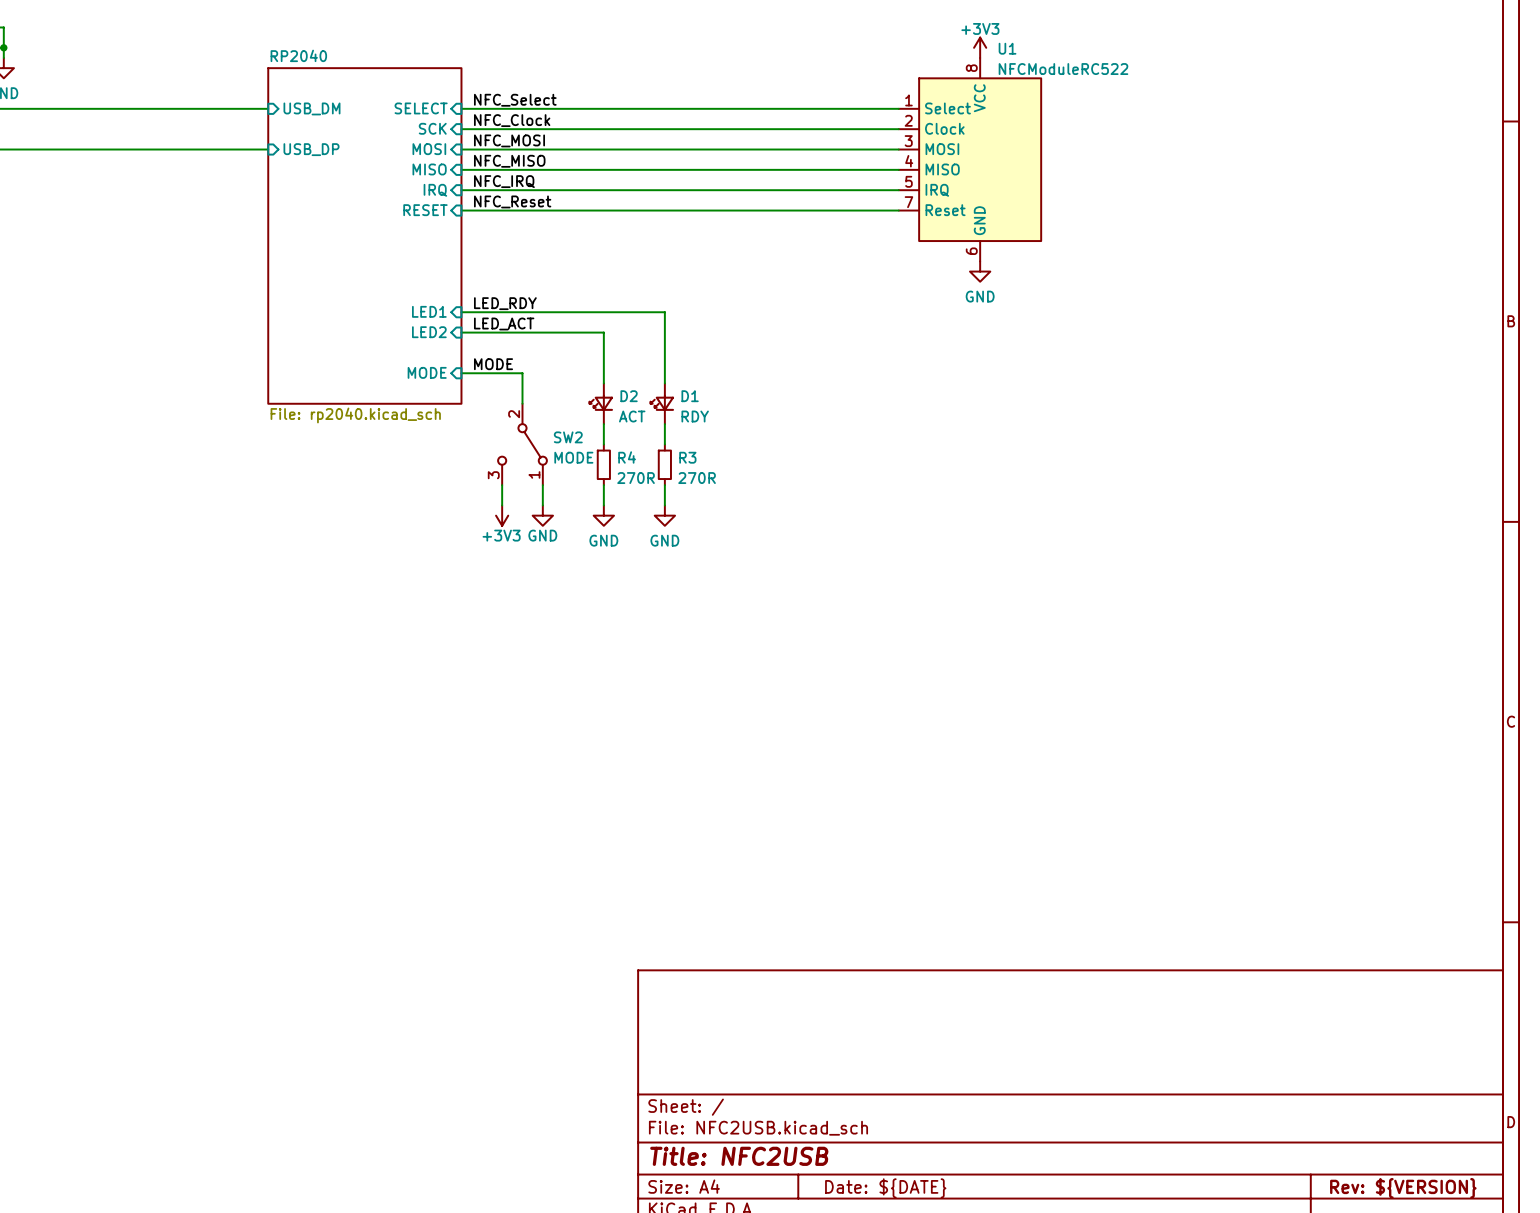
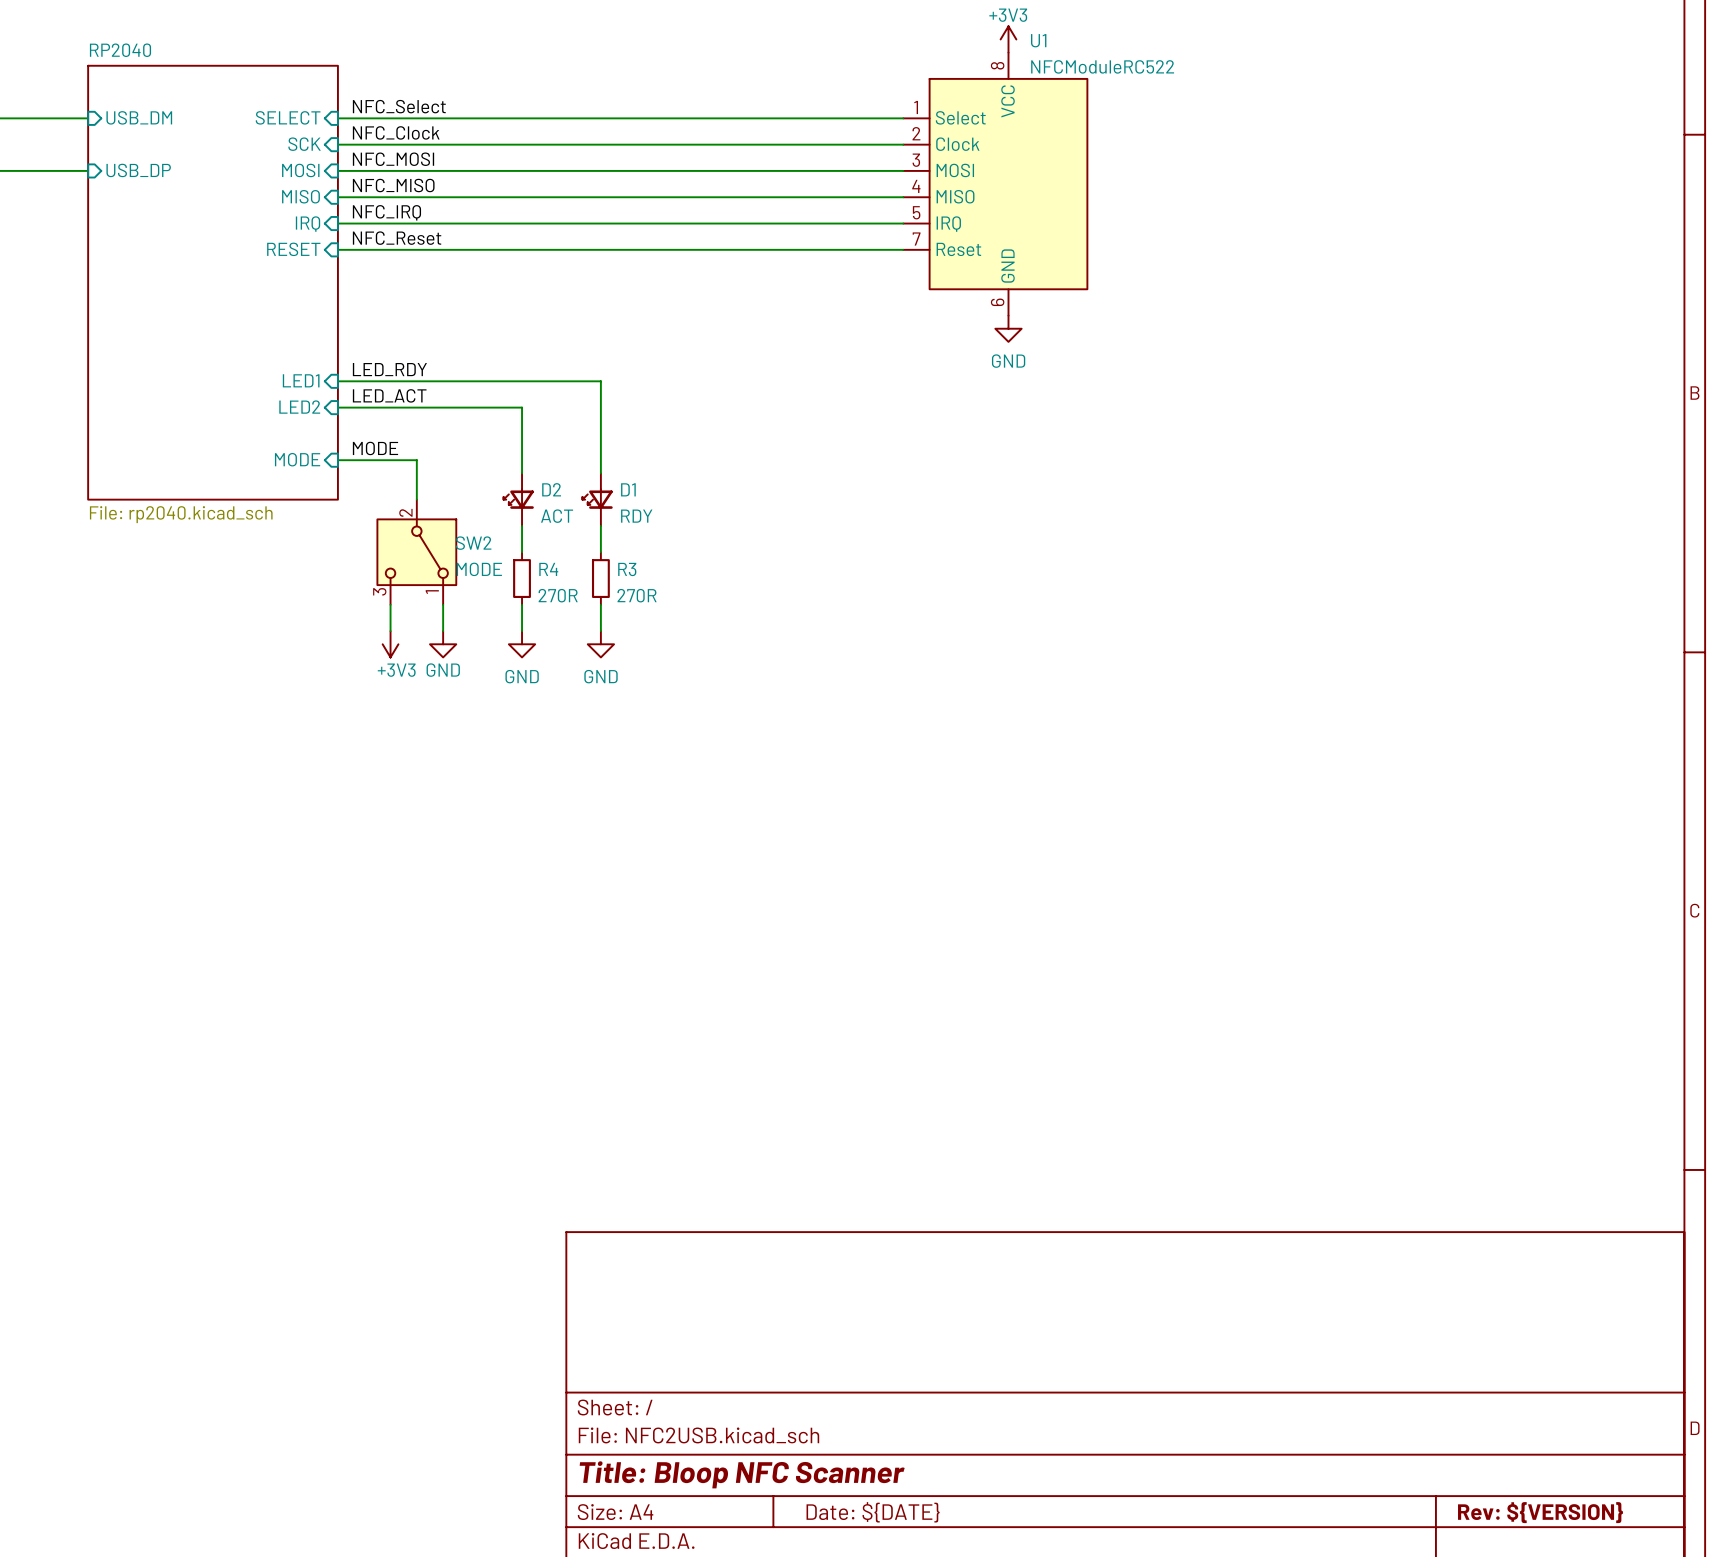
SW2 symbol: [498, 403, 547, 486] -> [377, 499, 457, 605]
title block: Title: NFC2USB (739, 1156) -> Title: Bloop NFC Scanner (742, 1474)

